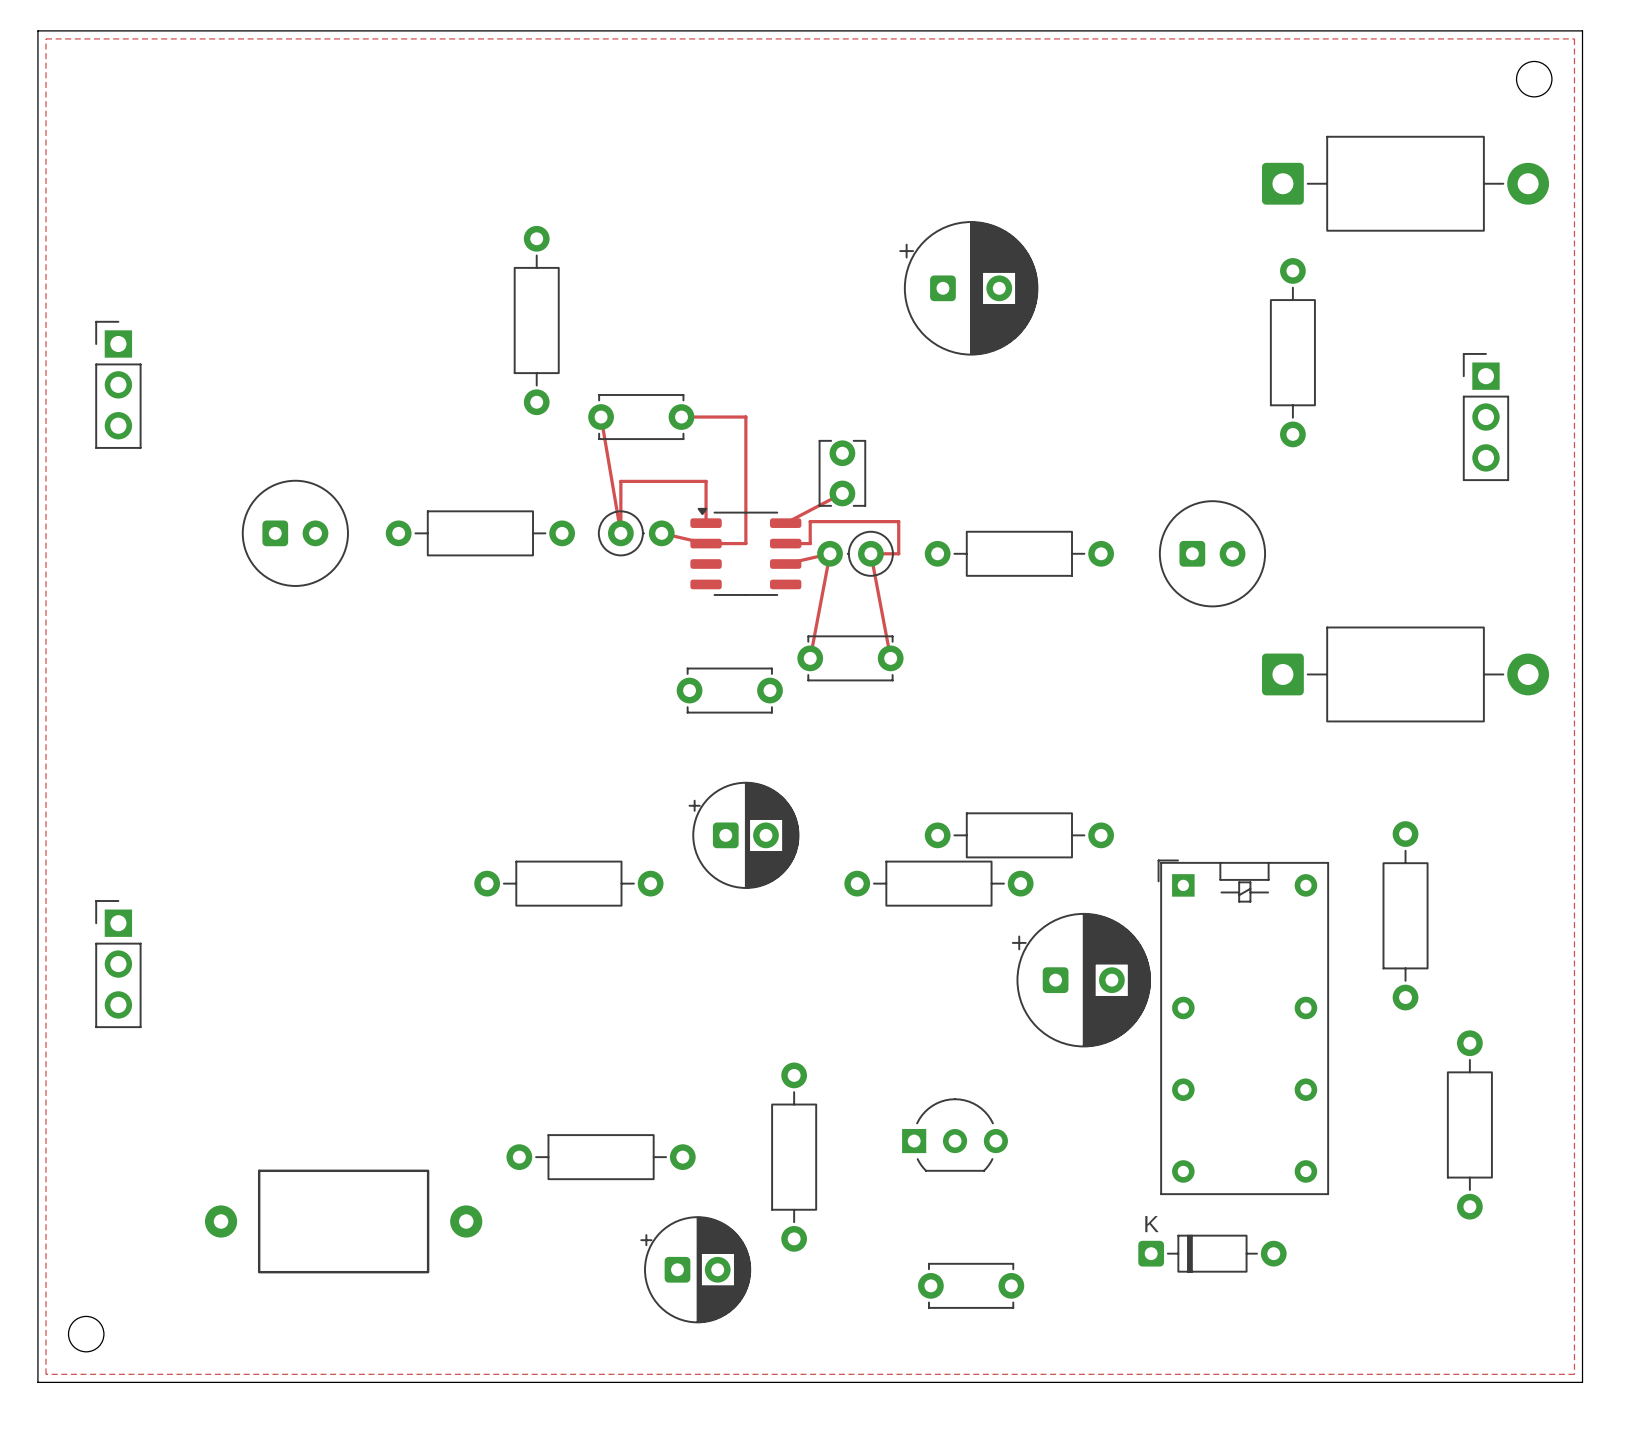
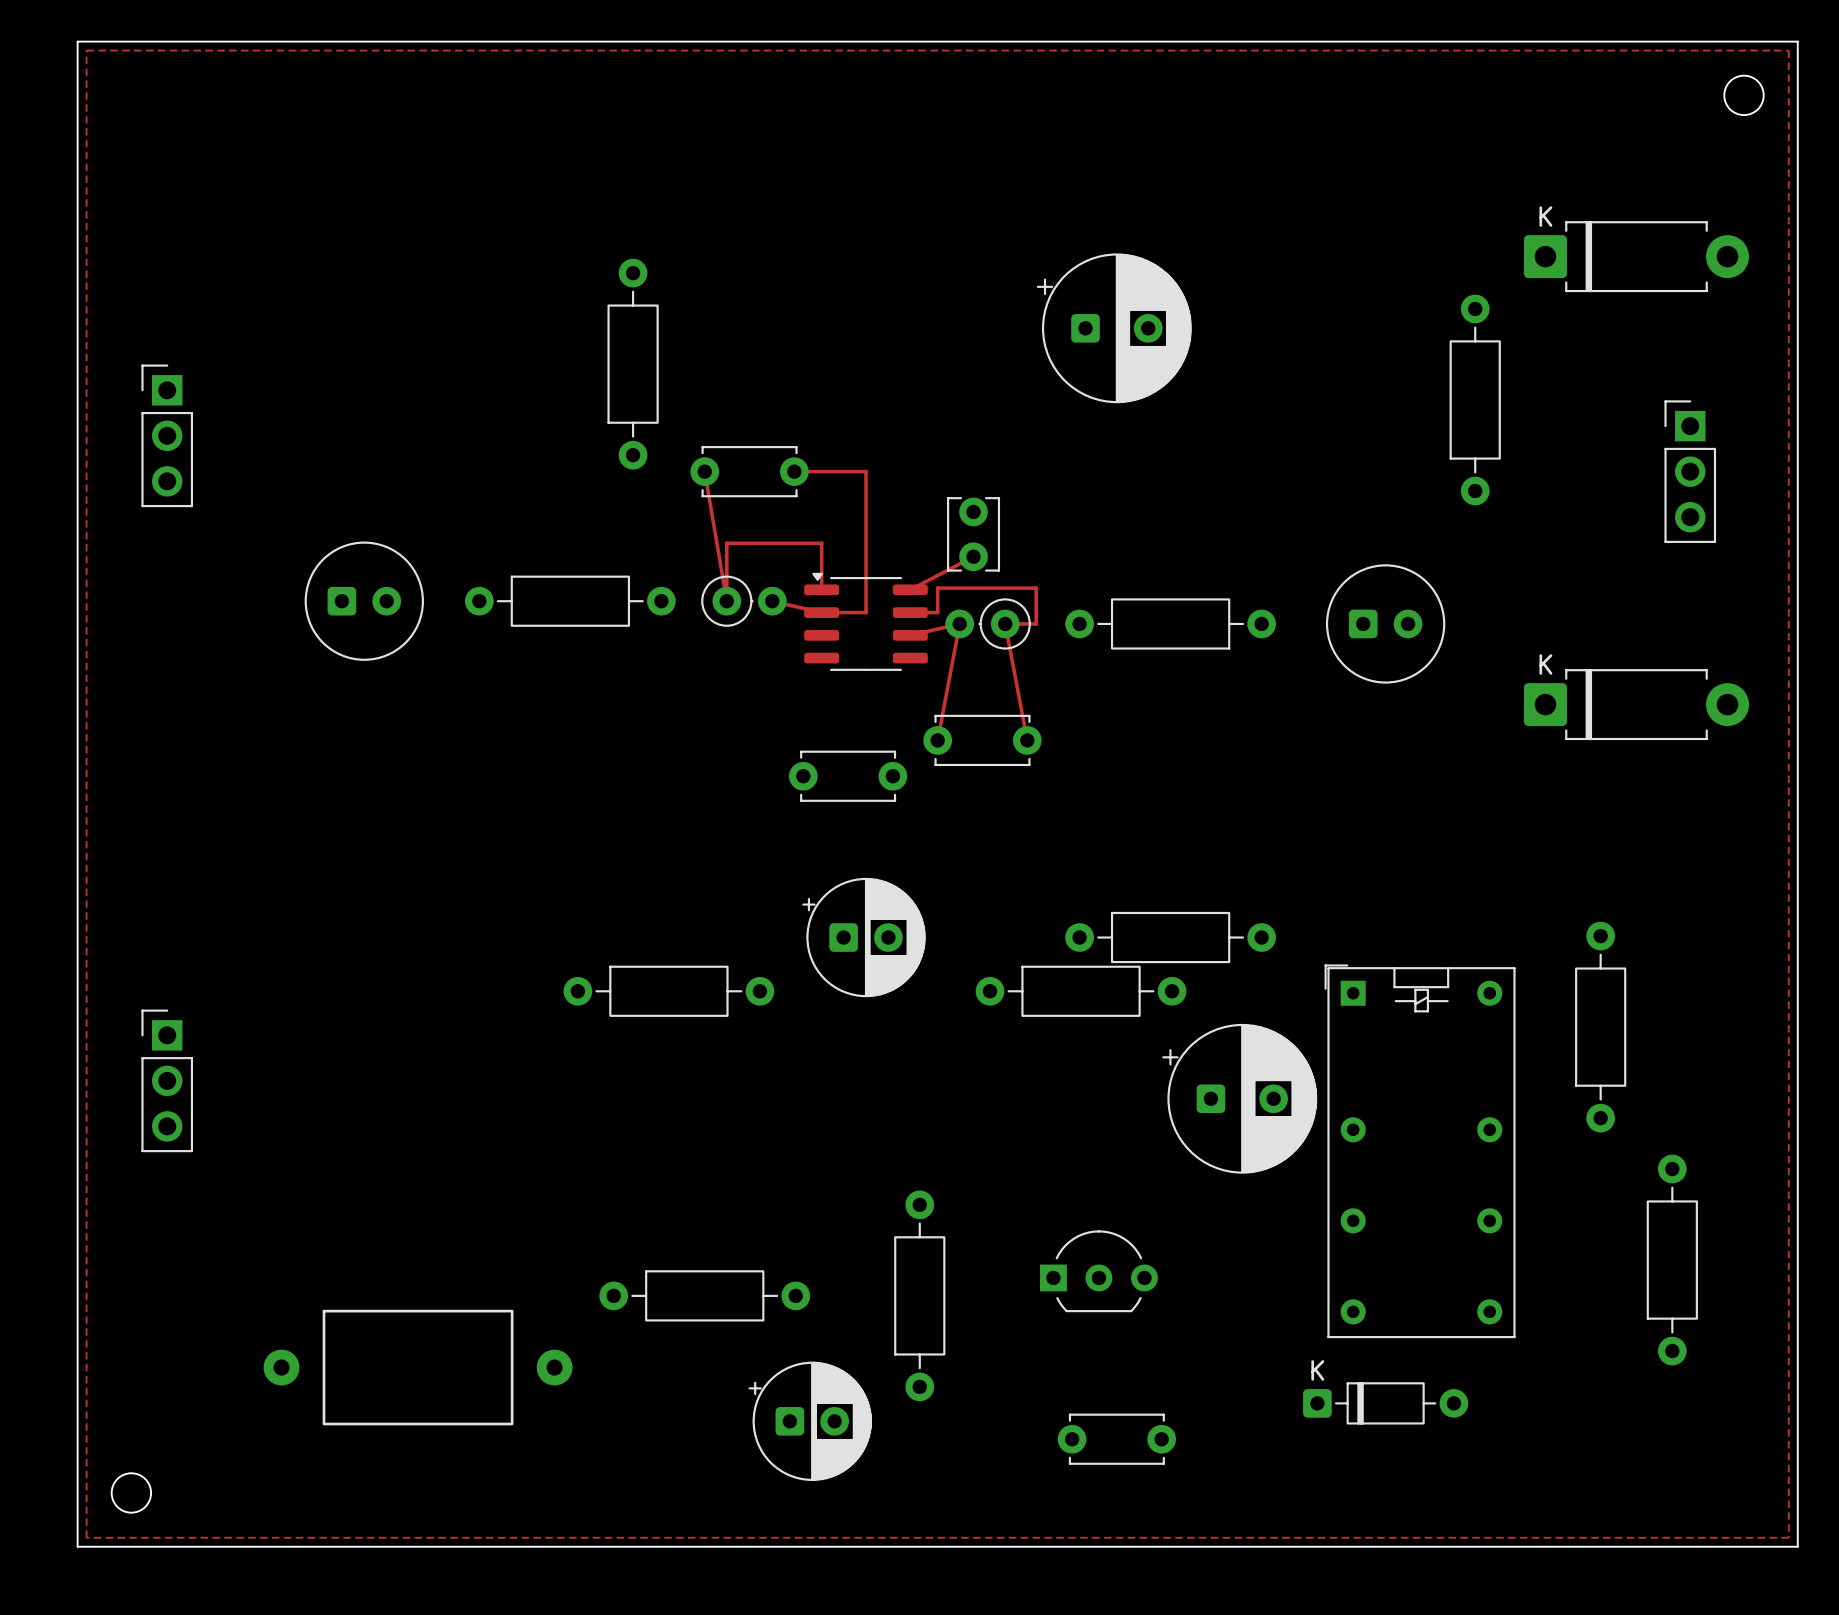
part: (1405, 183) -> none
part: none -> (1636, 256)
part: none -> (1636, 704)
part: (1405, 674) -> none

